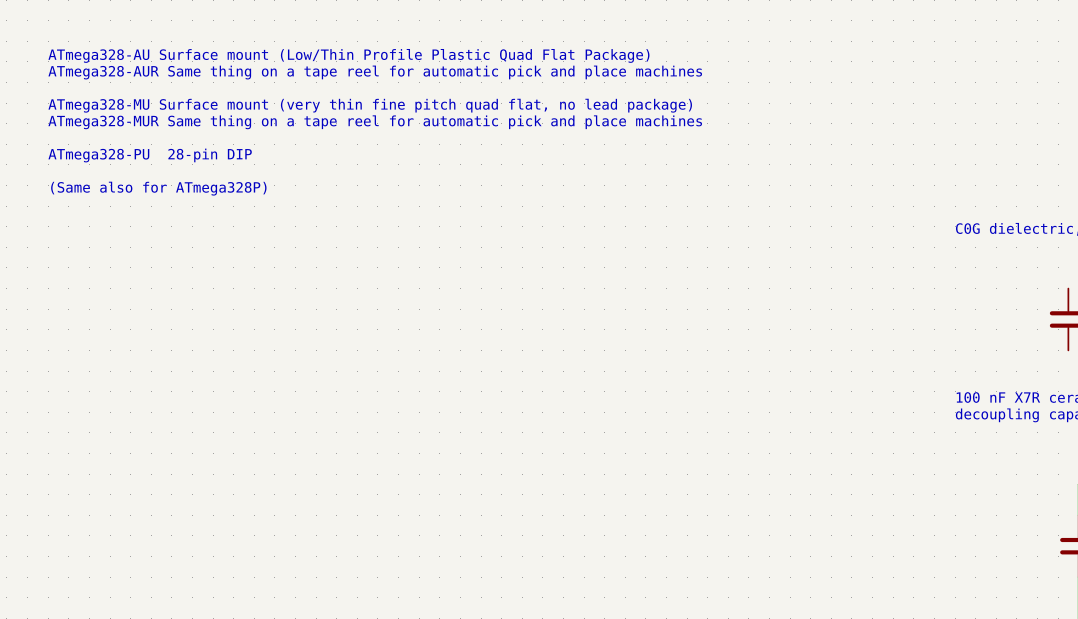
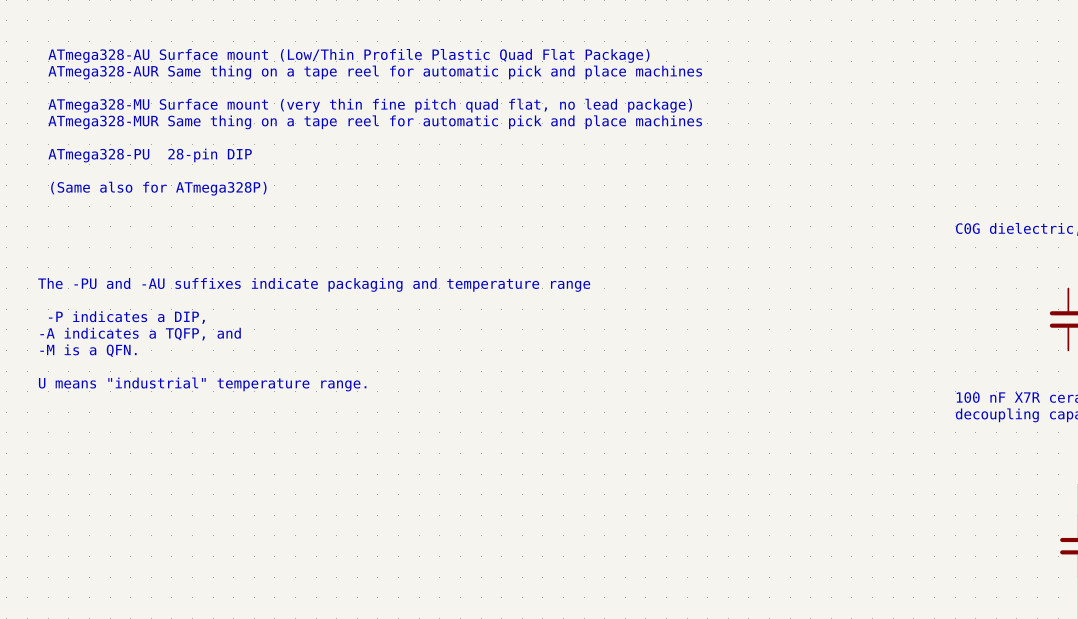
text: none -> The -PU and -AU suffixes indicate packaging and temperature range (314, 284)
text: none -> -P indicates a DIP, (126, 317)
text: none -> -A indicates a TQFP, and (140, 334)
text: none -> -M is a QFN. (88, 350)
text: none -> U means "industrial" temperature range. (202, 384)

